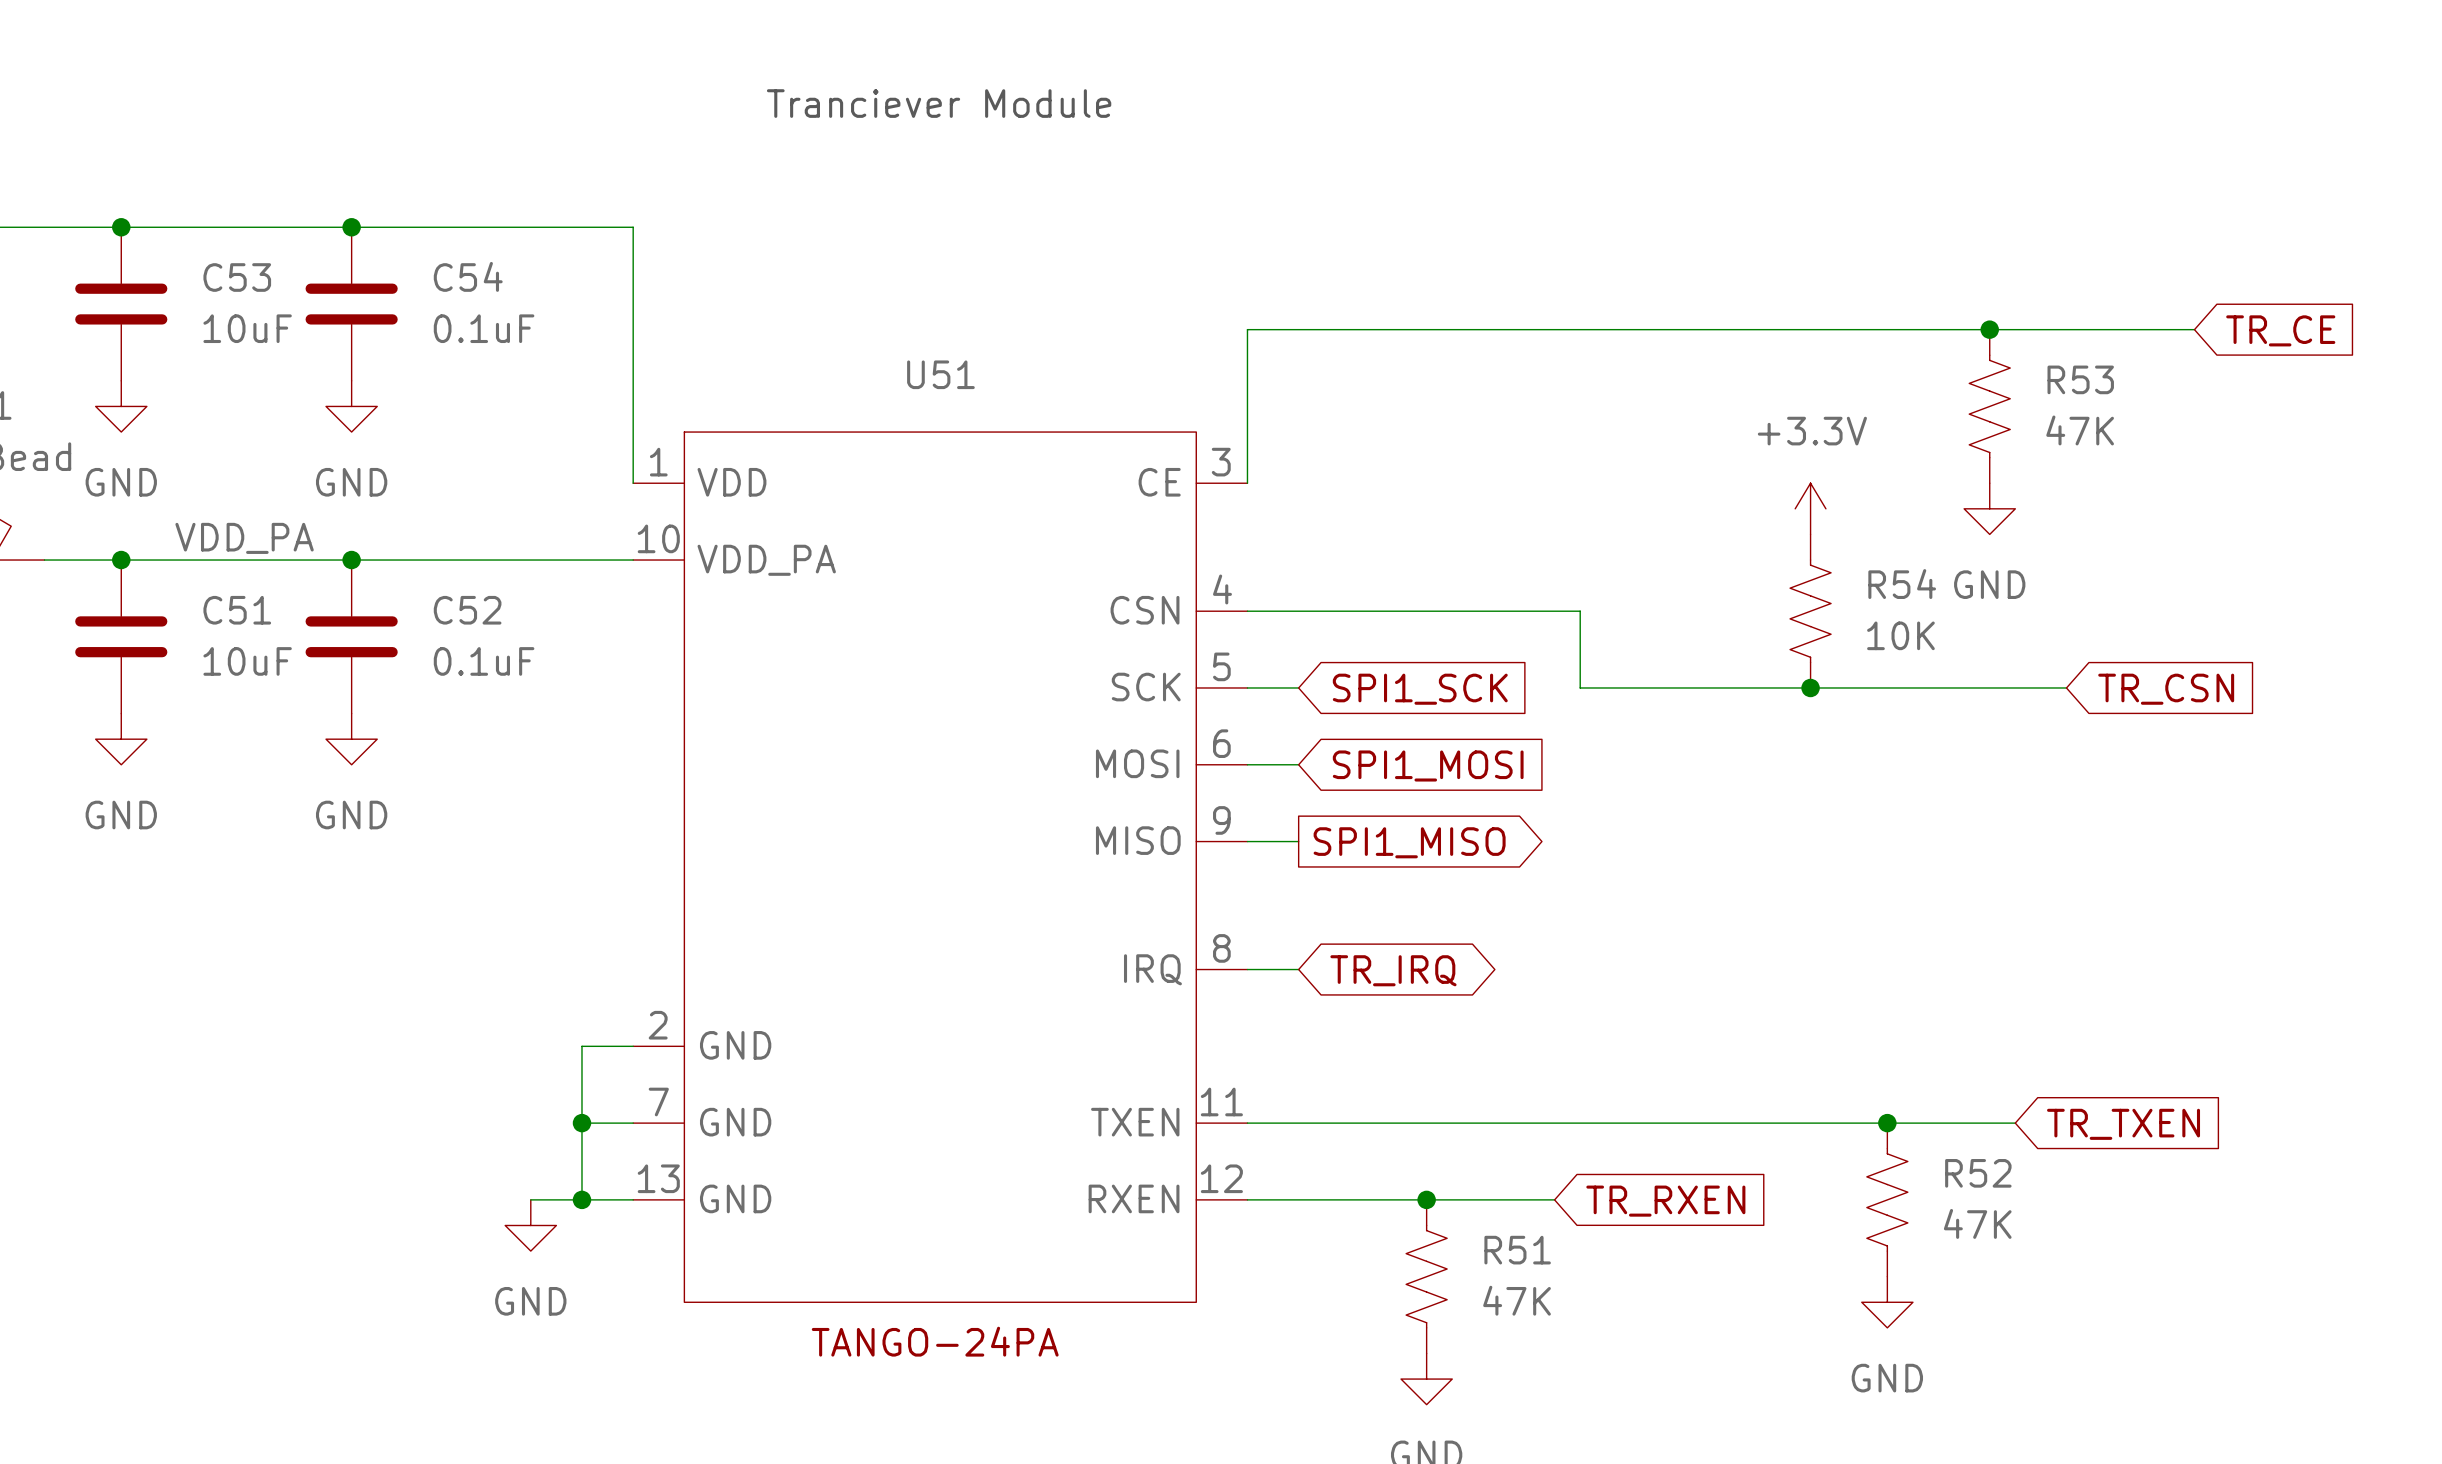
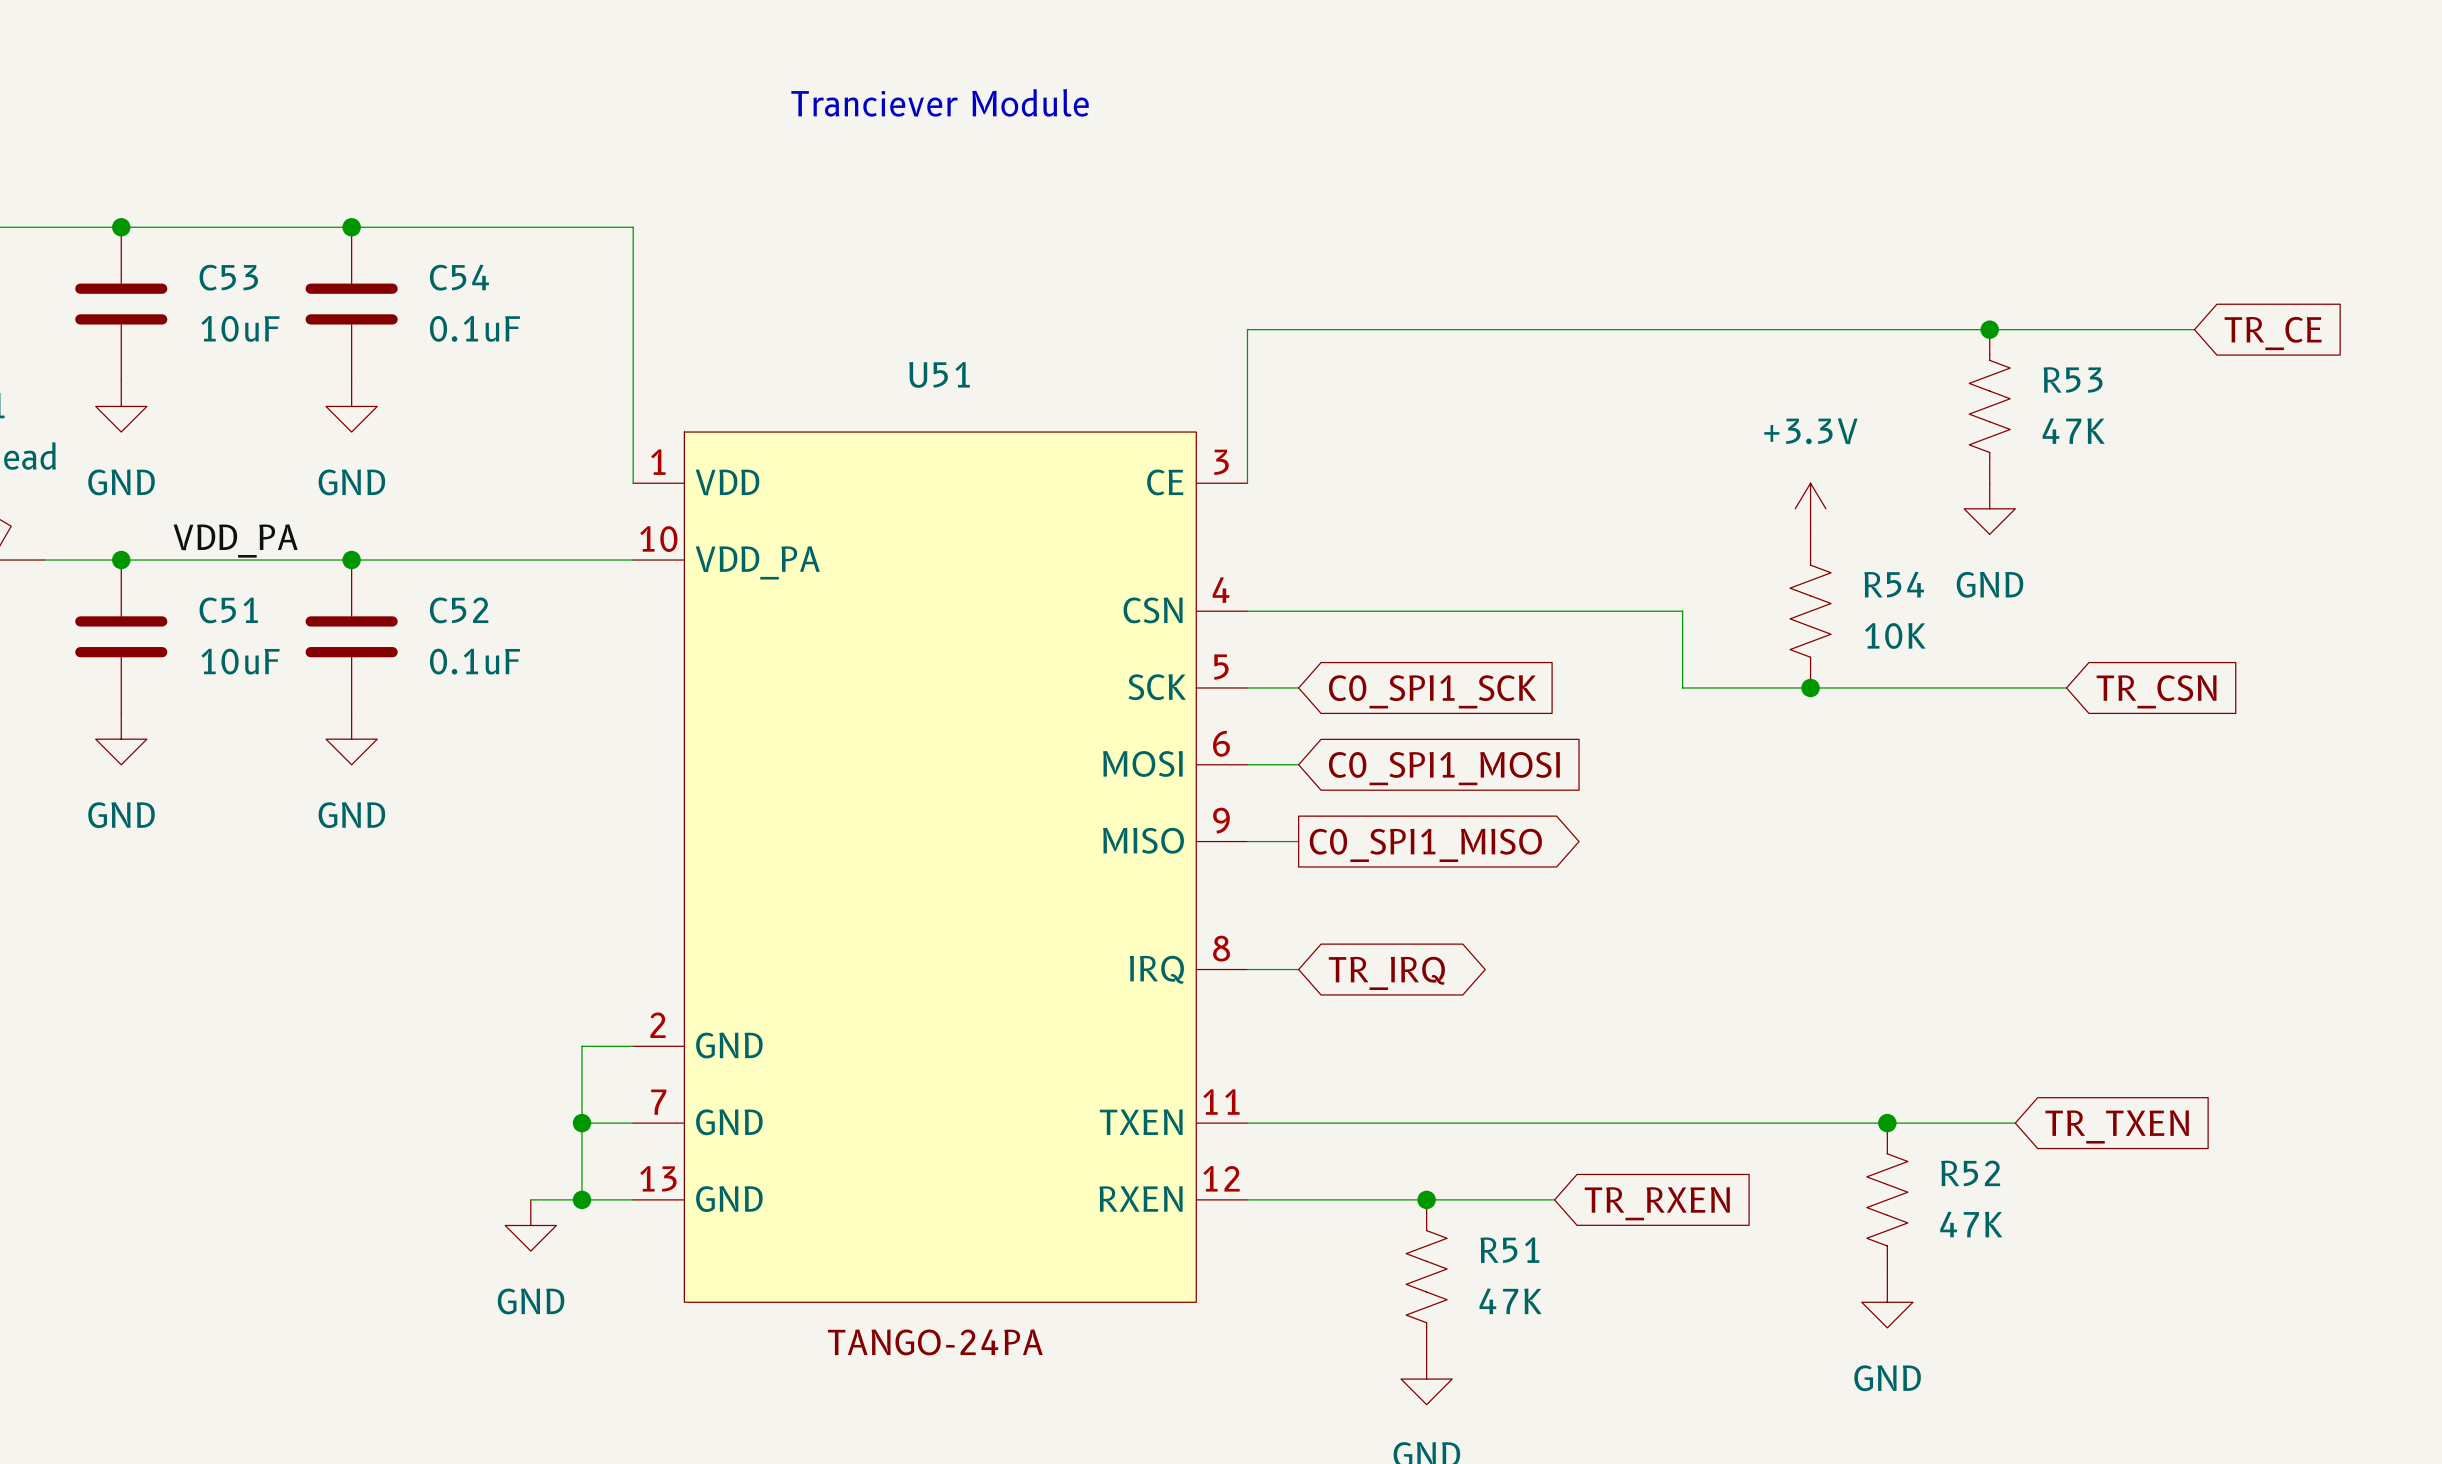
wire: (1580, 611) (1580, 687) (1682, 687) -> (1580, 611) (1682, 611) (1682, 687)
global label: SPI1_SCK (1420, 689) -> C0_SPI1_SCK (1432, 691)
global label: SPI1_MOSI (1428, 765) -> C0_SPI1_MOSI (1444, 768)
global label: SPI1_MISO (1409, 842) -> C0_SPI1_MISO (1425, 845)

